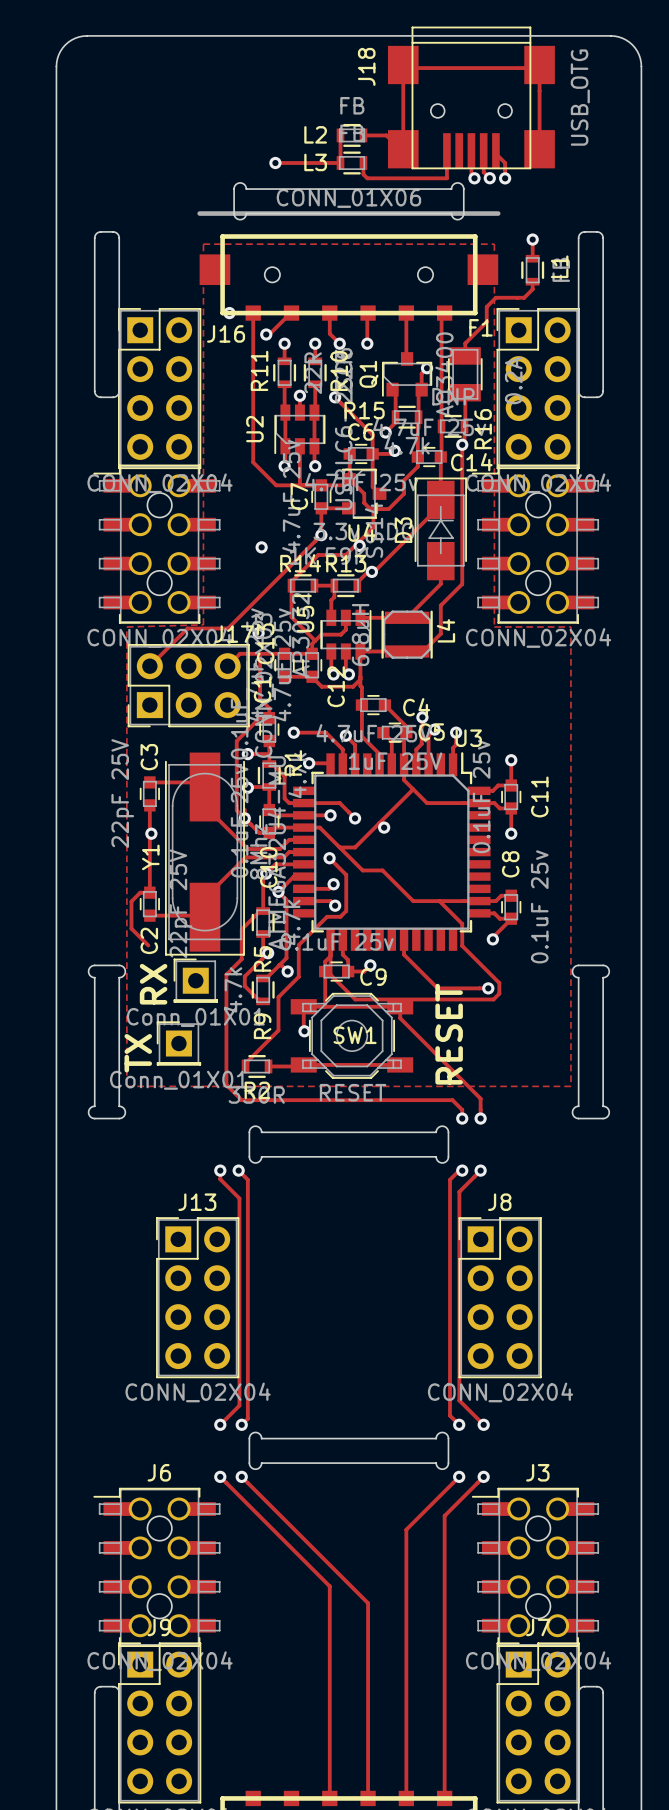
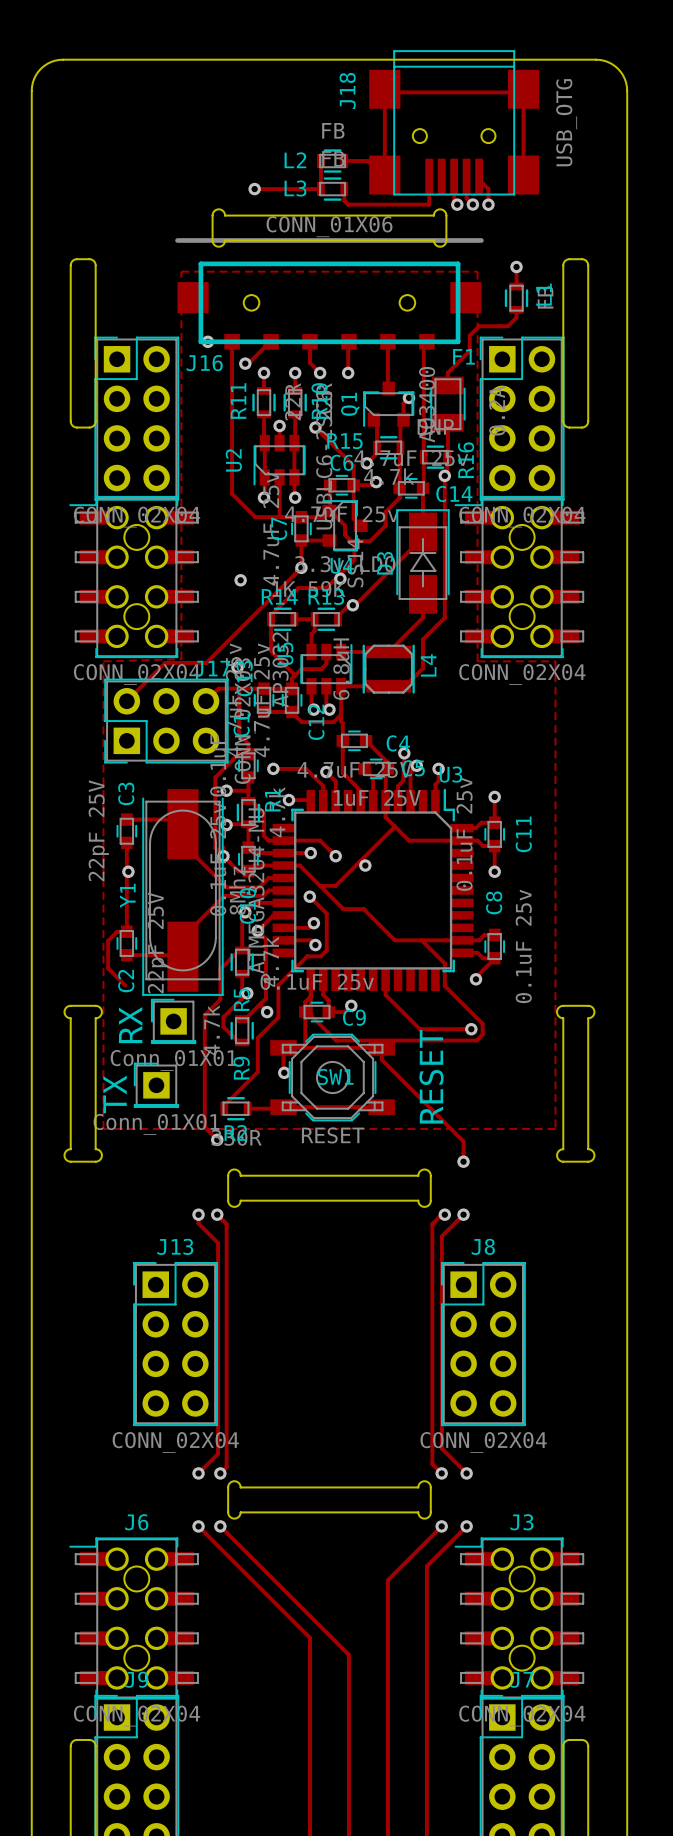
via: none -> (217, 1139)
track: (241, 1100) (452, 1100) (462, 1109) (462, 1118) -> none
via: (462, 1118) -> none

